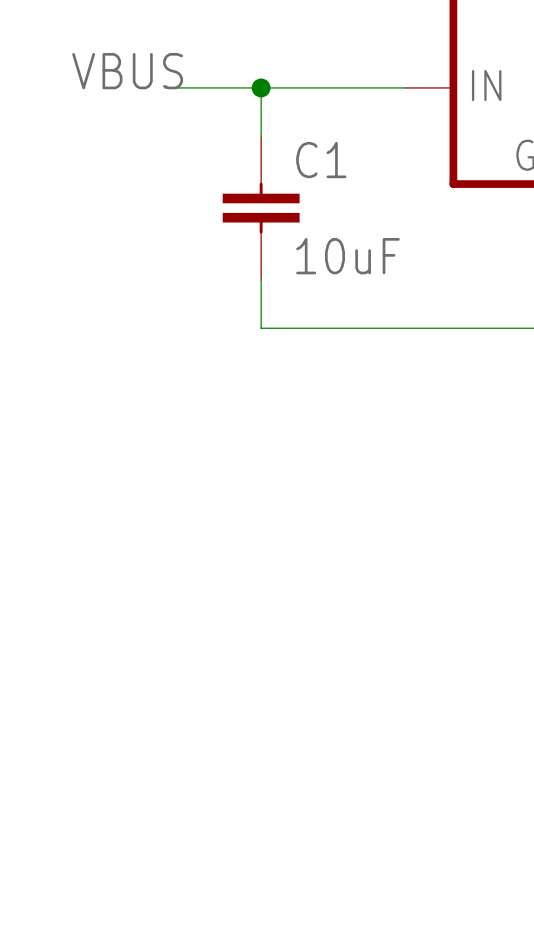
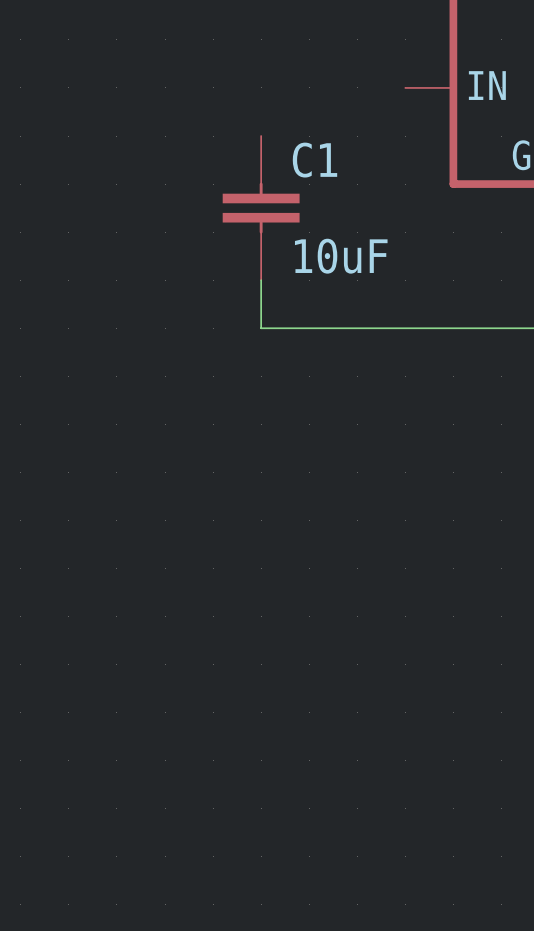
label: VBUS (127, 71) -> none
wire: (165, 87) (405, 87) -> none
wire: (261, 87) (261, 136) -> none
junction: (261, 87) -> none

